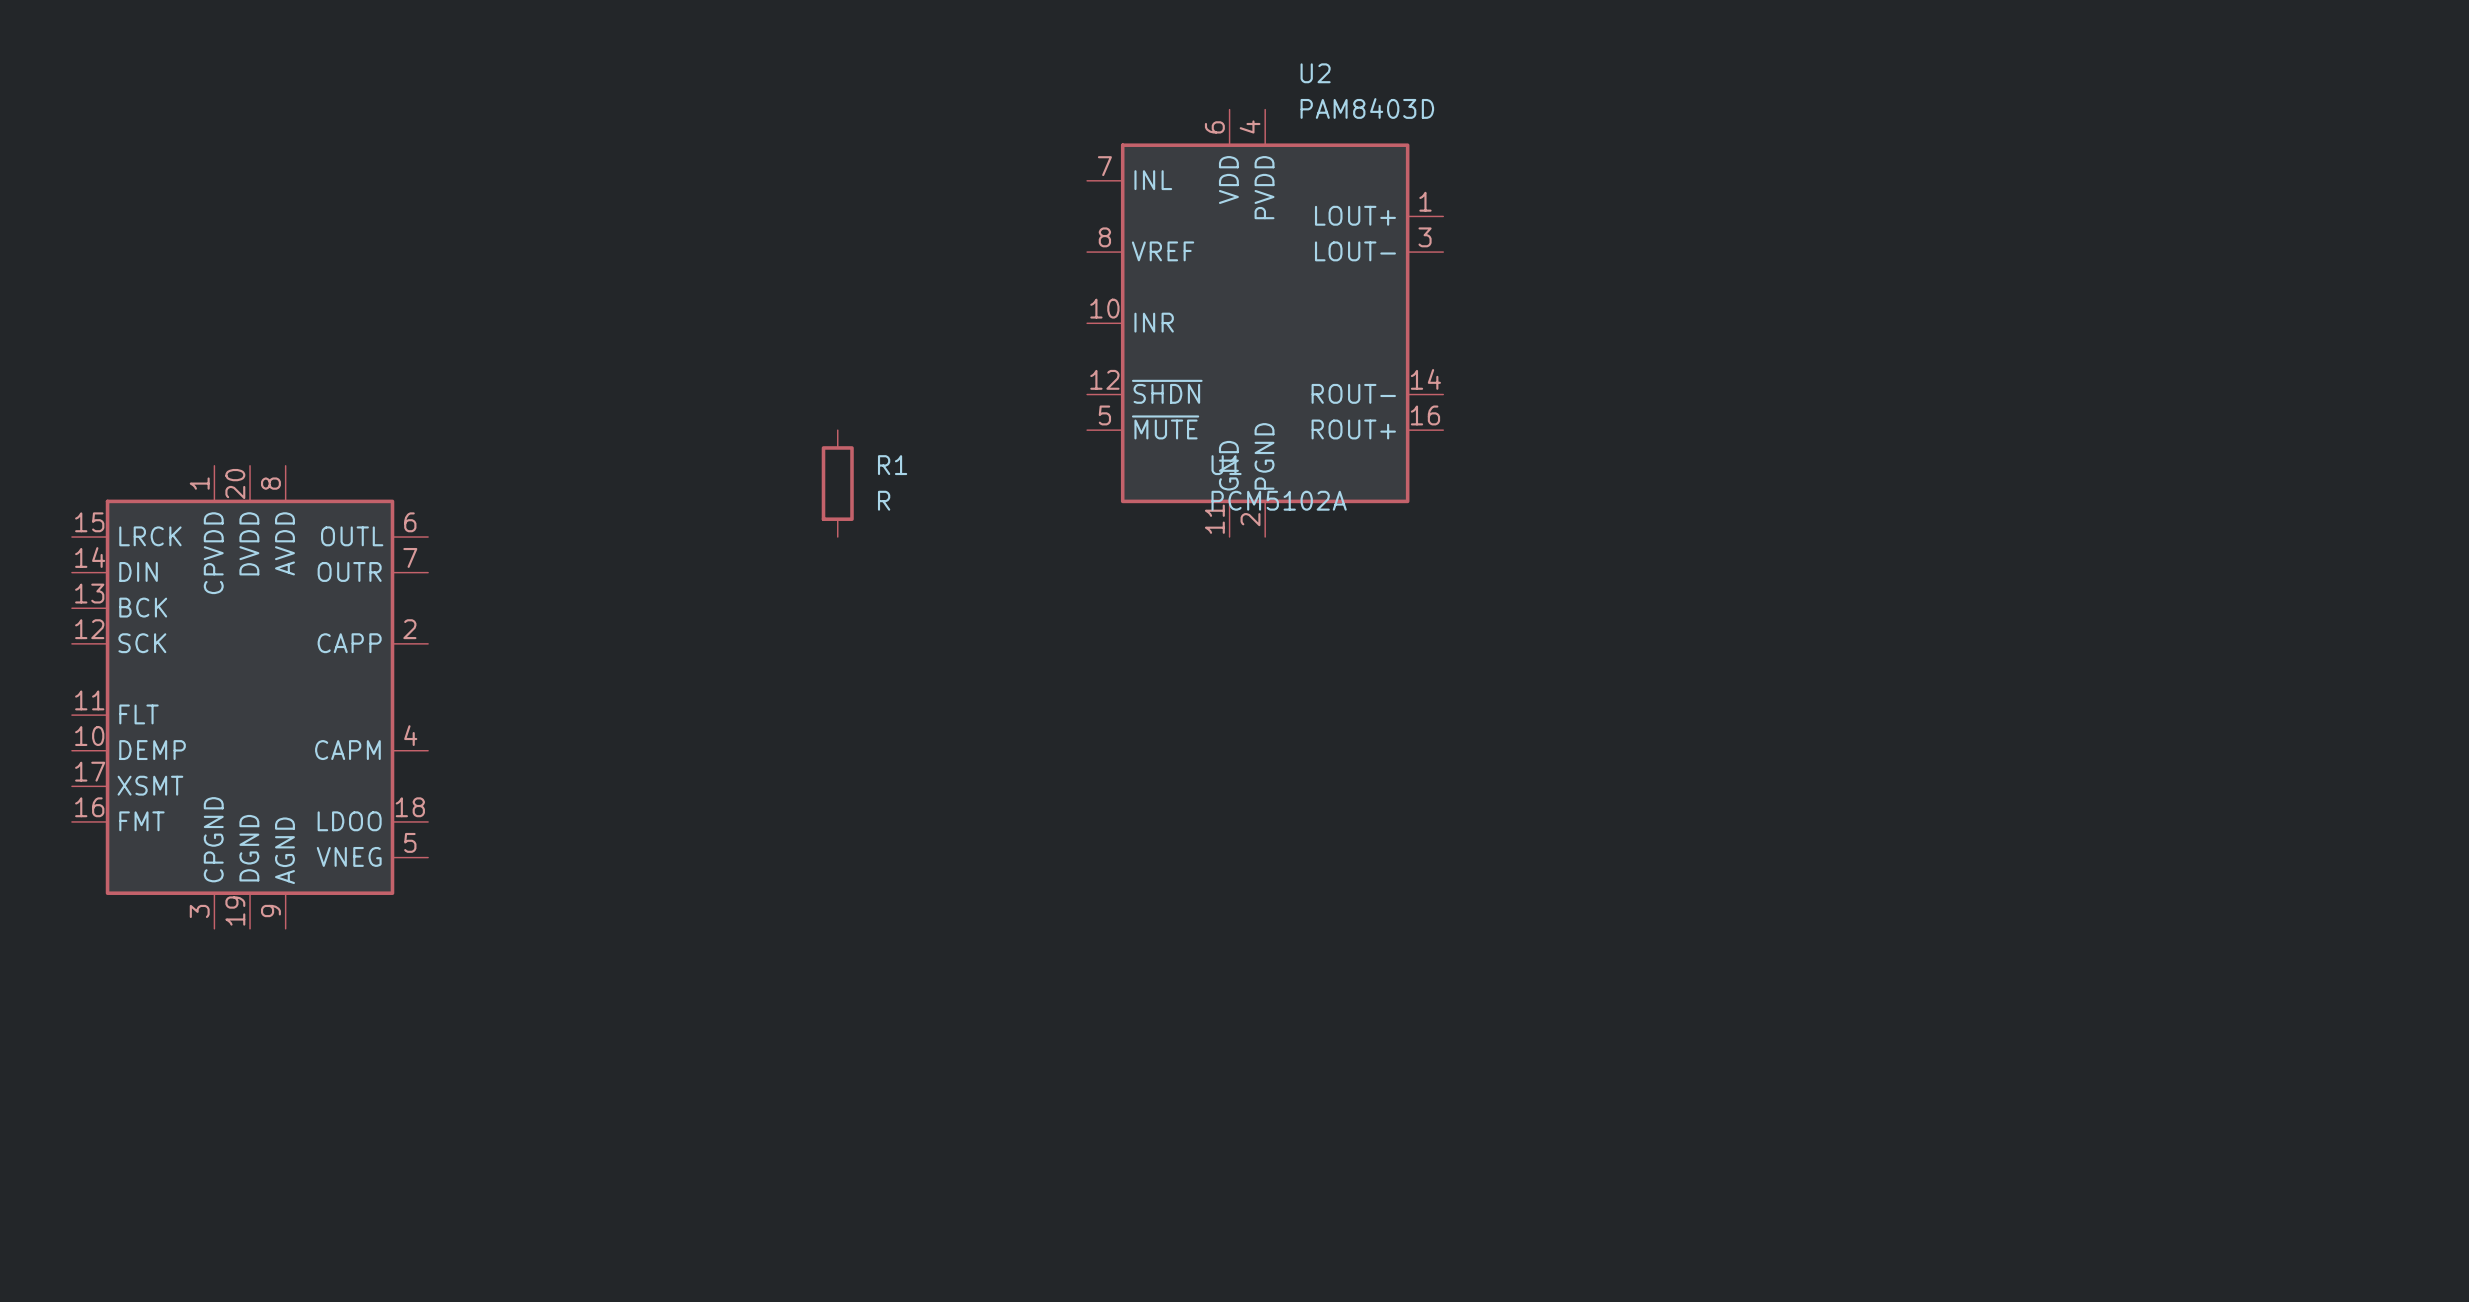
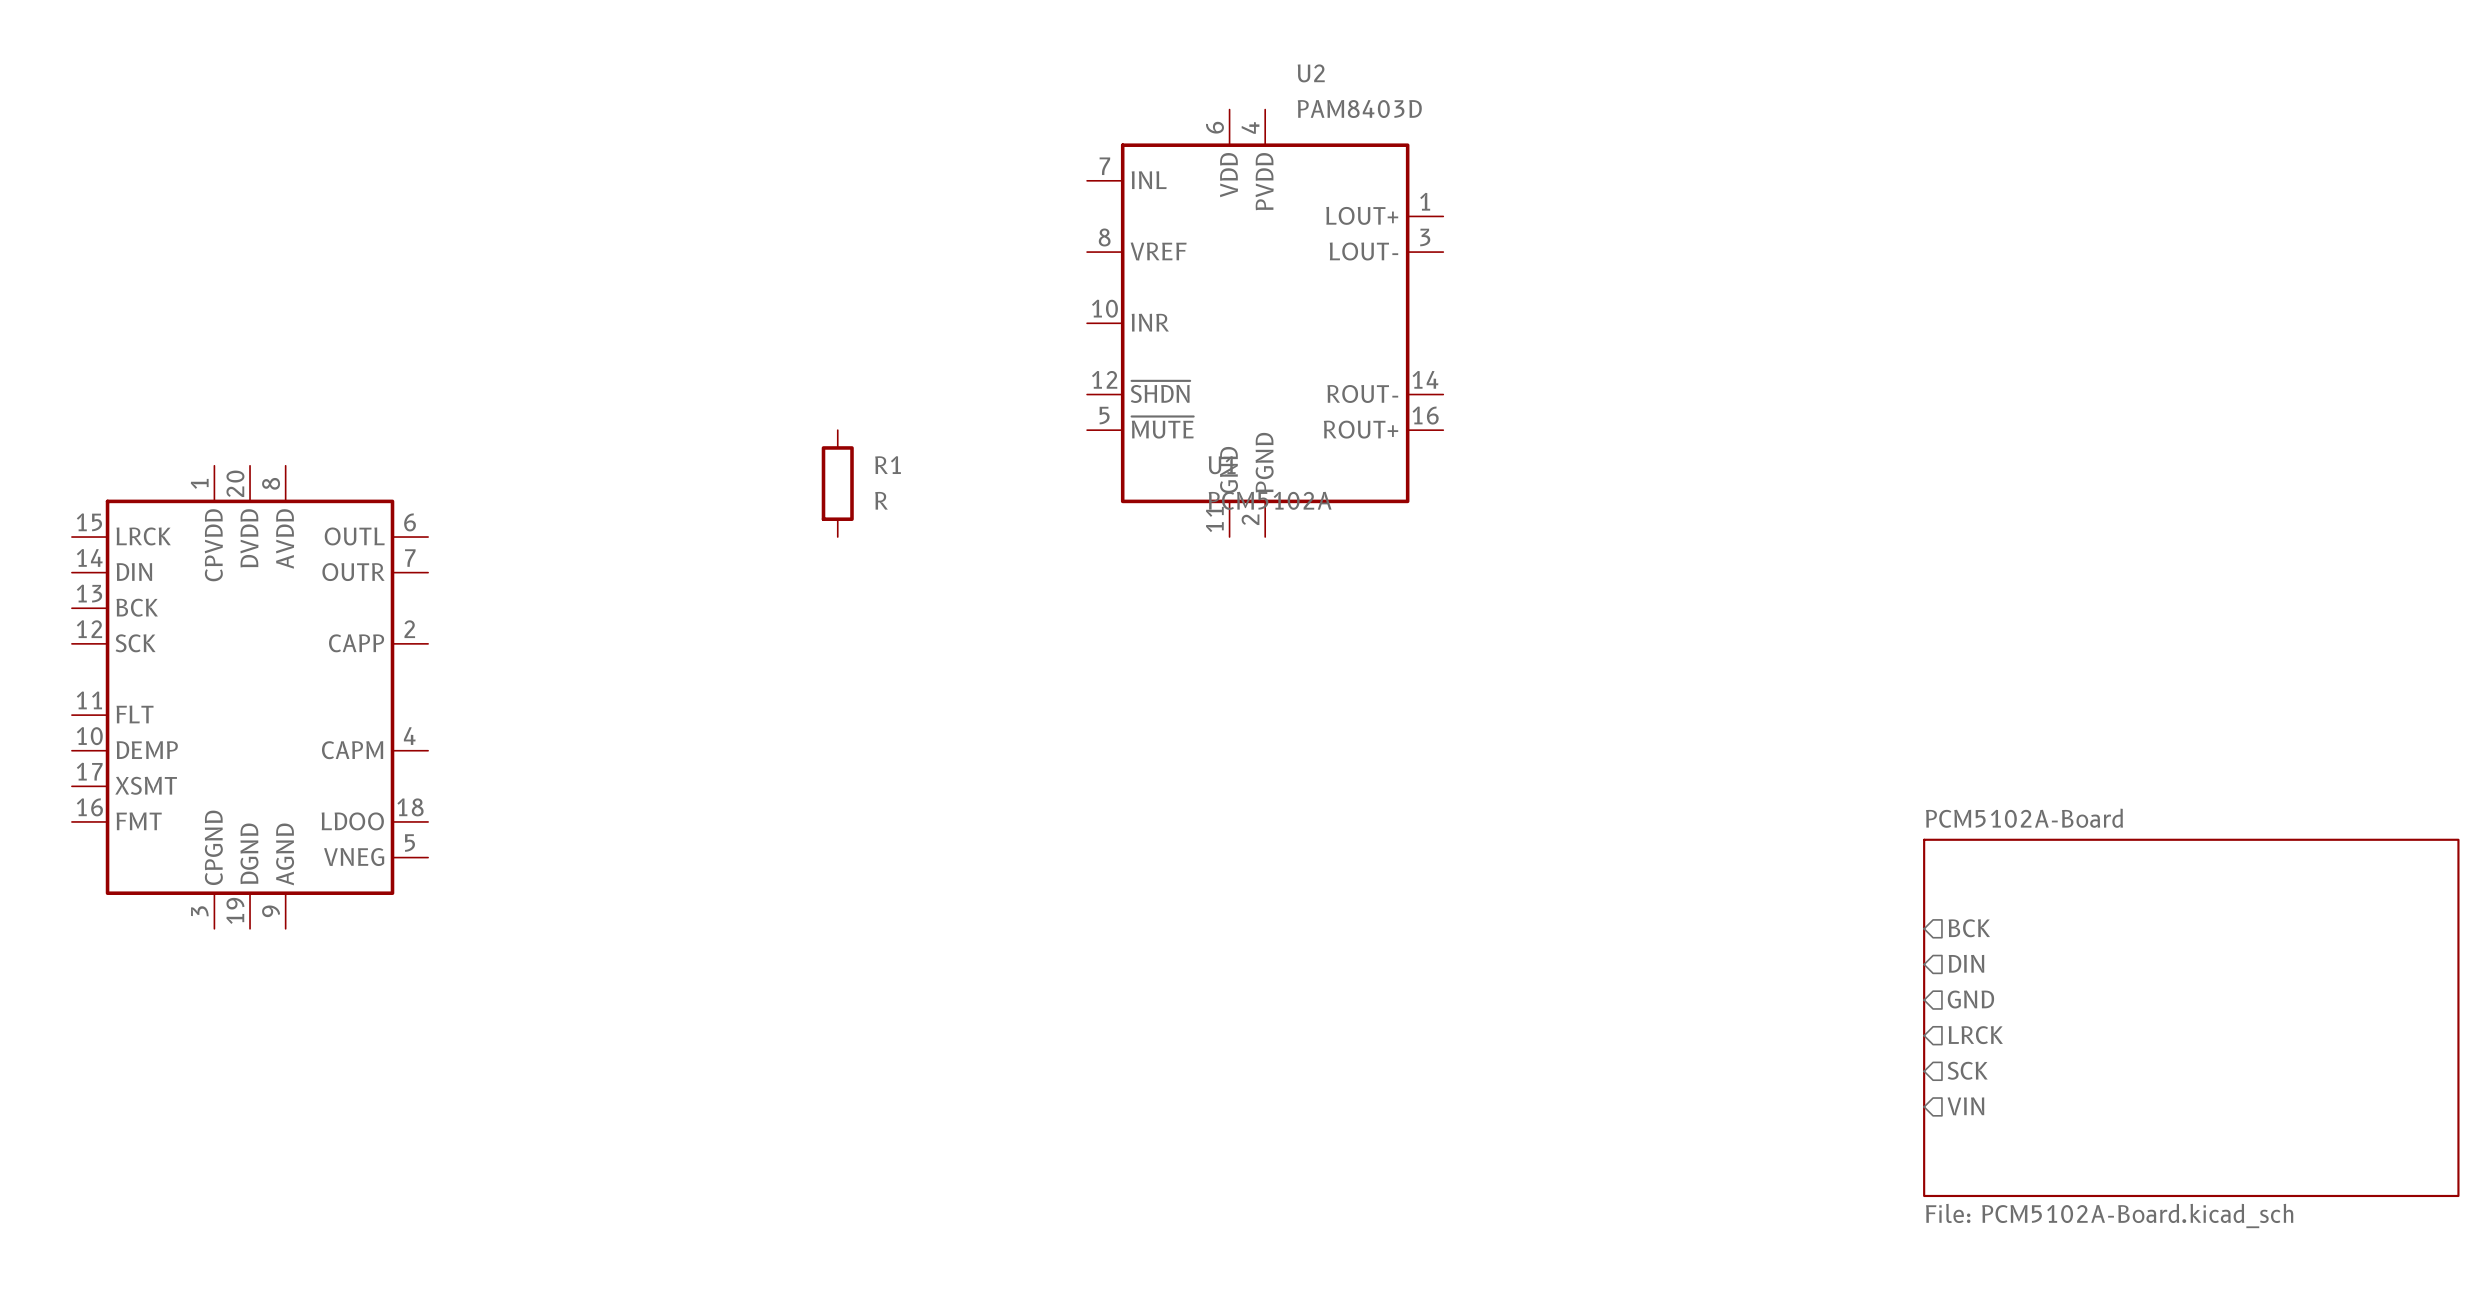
sheet pin: none -> BCK (1969, 928)
sheet pin: none -> DIN (1966, 963)
sheet pin: none -> GND (1970, 999)
sheet PCM5102A-Board: none -> File: PCM5102A-Board.kicad_sch (2191, 1017)
sheet pin: none -> LRCK (1975, 1035)
sheet pin: none -> SCK (1967, 1070)
sheet pin: none -> VIN (1965, 1106)

